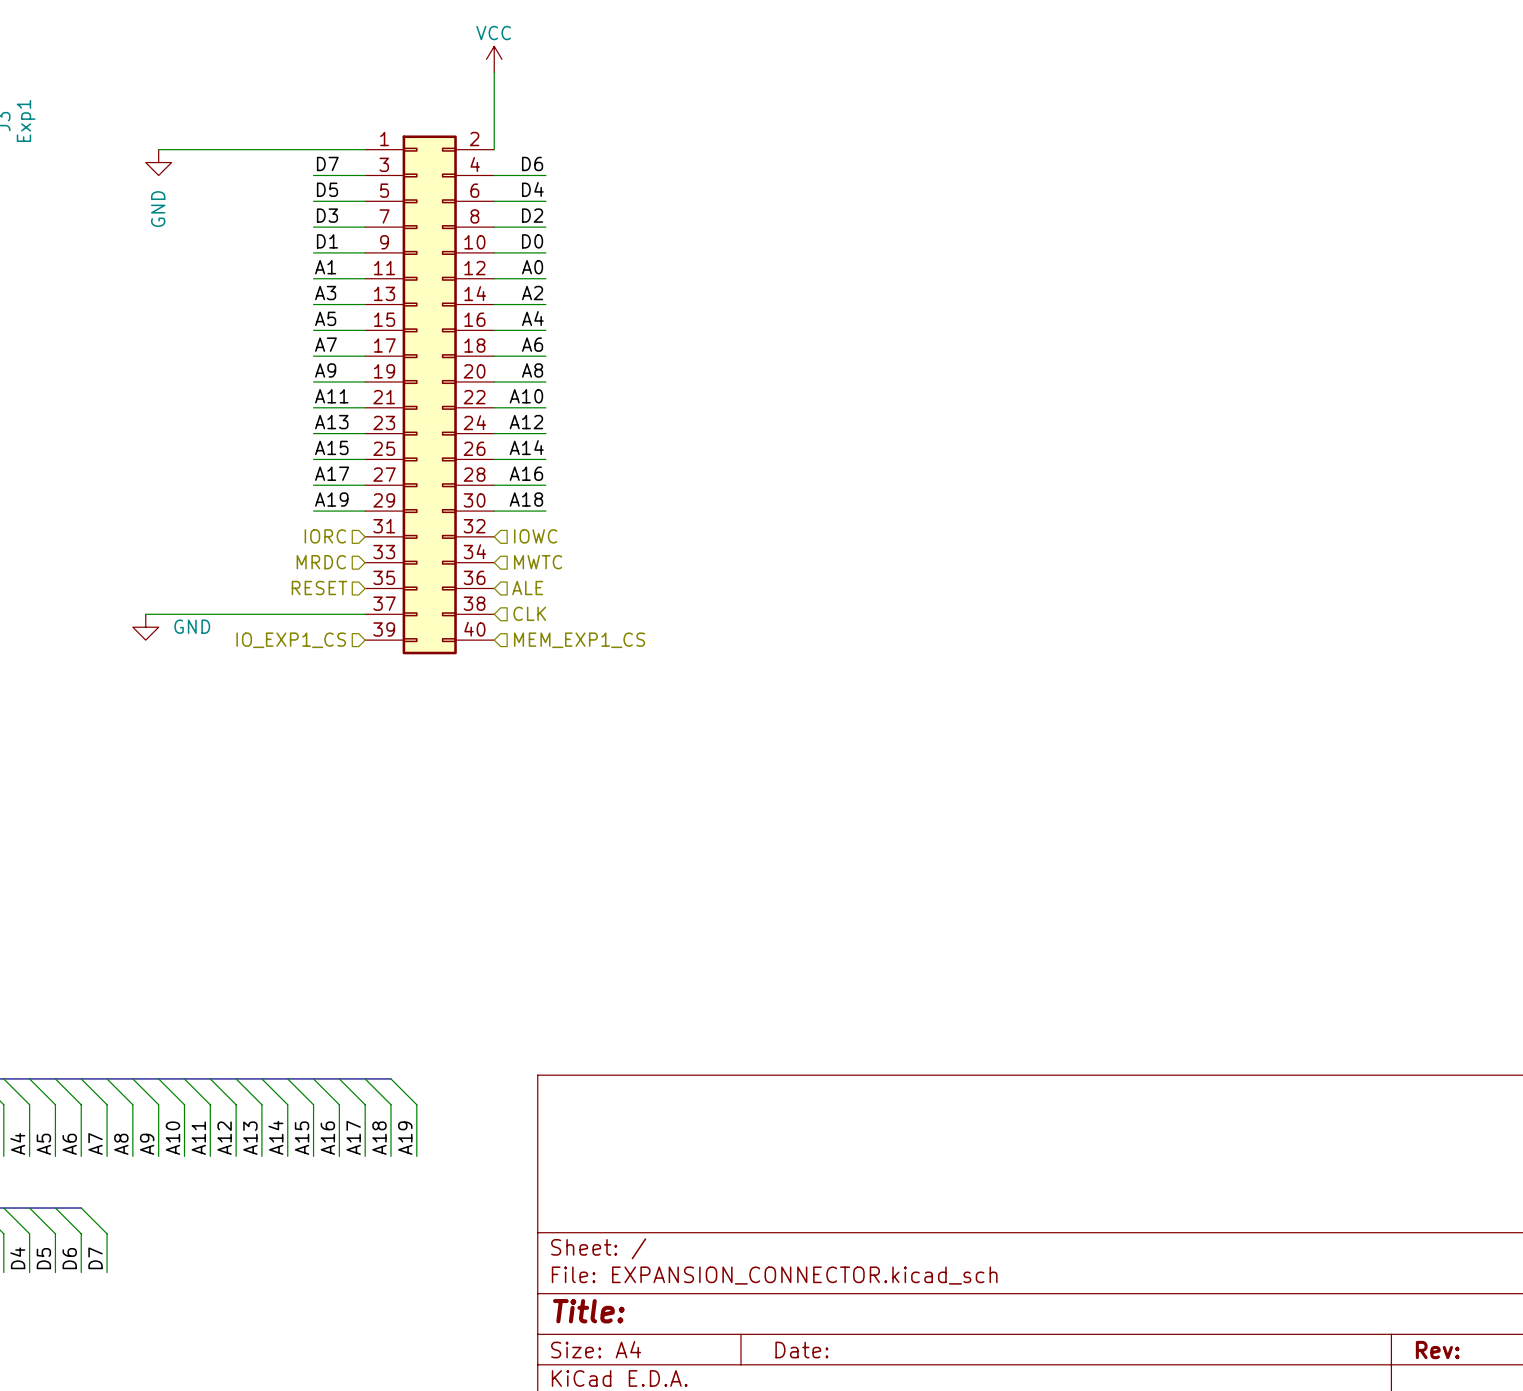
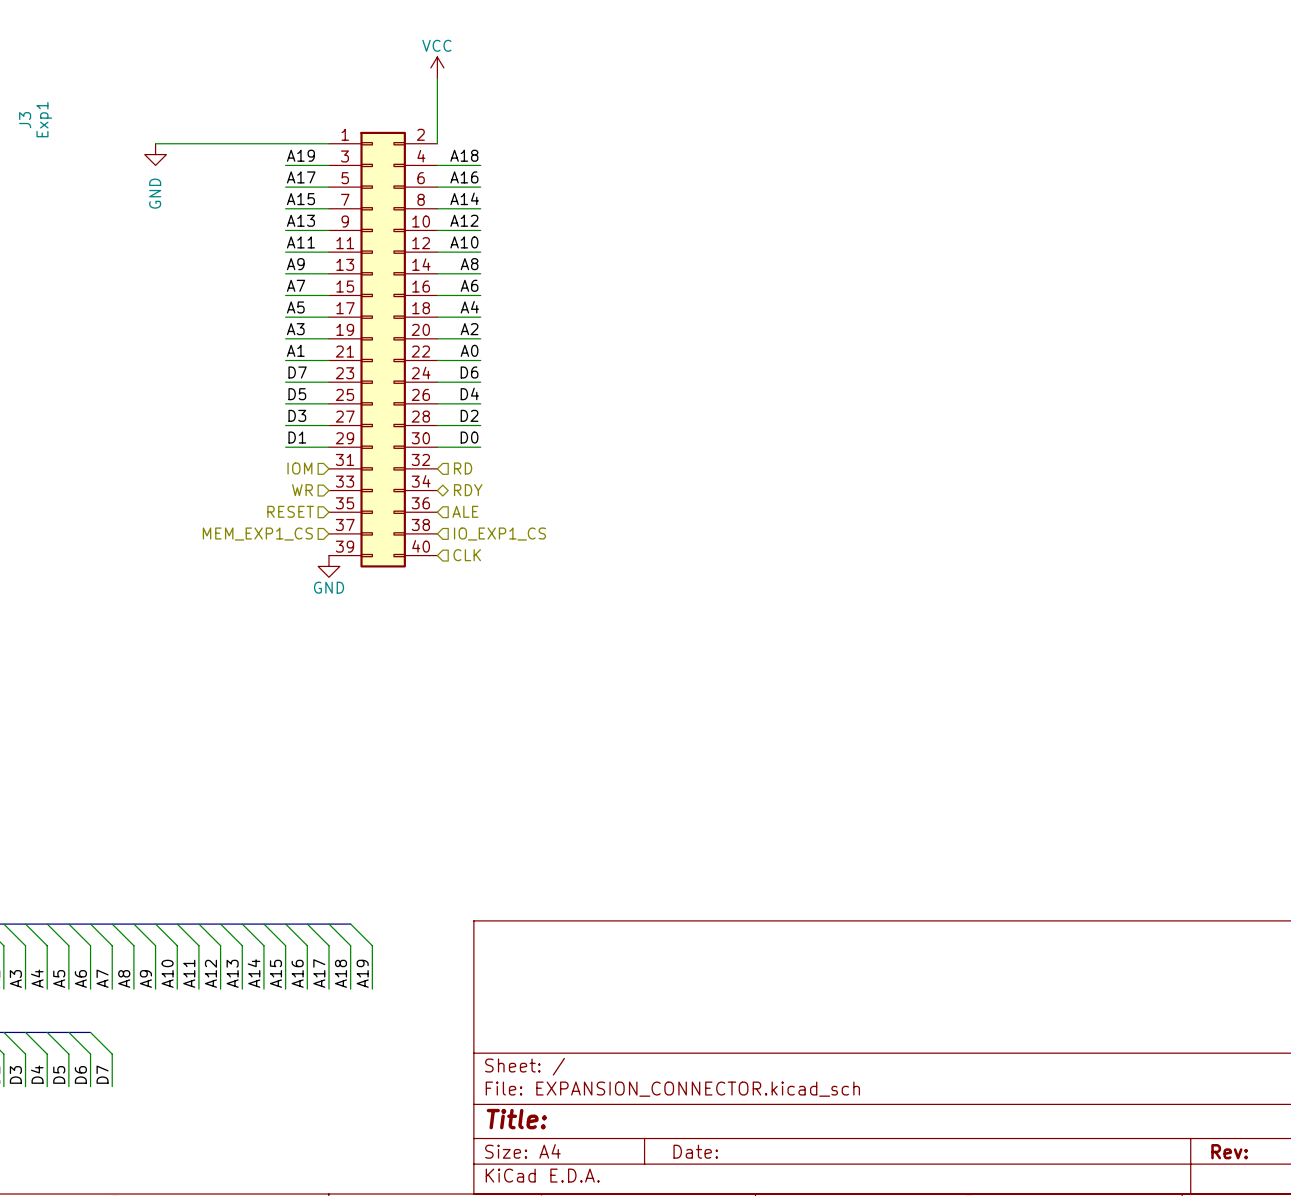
label: D7 (327, 163) -> A19 (300, 155)
label: D6 (532, 163) -> A18 (464, 155)
label: D5 (327, 189) -> A17 (301, 177)
label: D4 (532, 189) -> A16 (464, 177)
label: D3 (327, 215) -> A15 (300, 199)
label: D2 (532, 215) -> A14 (464, 198)
label: D1 (327, 241) -> A13 (300, 220)
label: D0 (532, 241) -> A12 (464, 220)
label: A1 (325, 267) -> A11 (300, 242)
label: A0 (532, 267) -> A10 (464, 242)
label: A3 (325, 293) -> A9 (295, 264)
label: A2 (532, 293) -> A8 (469, 264)
label: A5 (325, 318) -> A7 (296, 285)
label: A4 (532, 318) -> A6 (469, 285)
label: A7 (325, 344) -> A5 (295, 307)
label: A6 (532, 344) -> A4 (469, 307)
label: A9 (325, 370) -> A3 (295, 329)
label: A8 (532, 370) -> A2 (469, 329)
label: A11 (331, 396) -> A1 (295, 350)
label: A10 (526, 396) -> A0 (469, 350)
label: A13 (331, 422) -> D7 (297, 372)
label: A12 (526, 422) -> D6 (469, 372)
label: A15 (331, 447) -> D5 (297, 394)
label: A14 (526, 447) -> D4 (469, 393)
label: A17 (332, 473) -> D3 (297, 415)
label: A16 (526, 473) -> D2 (469, 415)
label: A19 (331, 499) -> D1 (297, 437)
label: A18 (526, 499) -> D0 (469, 437)
hierarchical label: IORC (325, 536) -> IOM (299, 468)
hierarchical label: IOWC (535, 536) -> RD (463, 468)
hierarchical label: MRDC (321, 562) -> WR (302, 490)
hierarchical label shape: input (538, 562) -> bidirectional (468, 490)
hierarchical label: MWTC (538, 562) -> RDY (468, 490)
hierarchical label: CLK (529, 613) -> IO_EXP1_CS (499, 534)
wire: (145, 614) (365, 614) -> none
power symbol text position: GND (192, 626) -> GND (329, 587)
power symbol position: GND (145, 627) -> GND (328, 566)
hierarchical label: IO_EXP1_CS (291, 640) -> MEM_EXP1_CS (257, 534)
hierarchical label: MEM_EXP1_CS (579, 640) -> CLK (467, 555)

